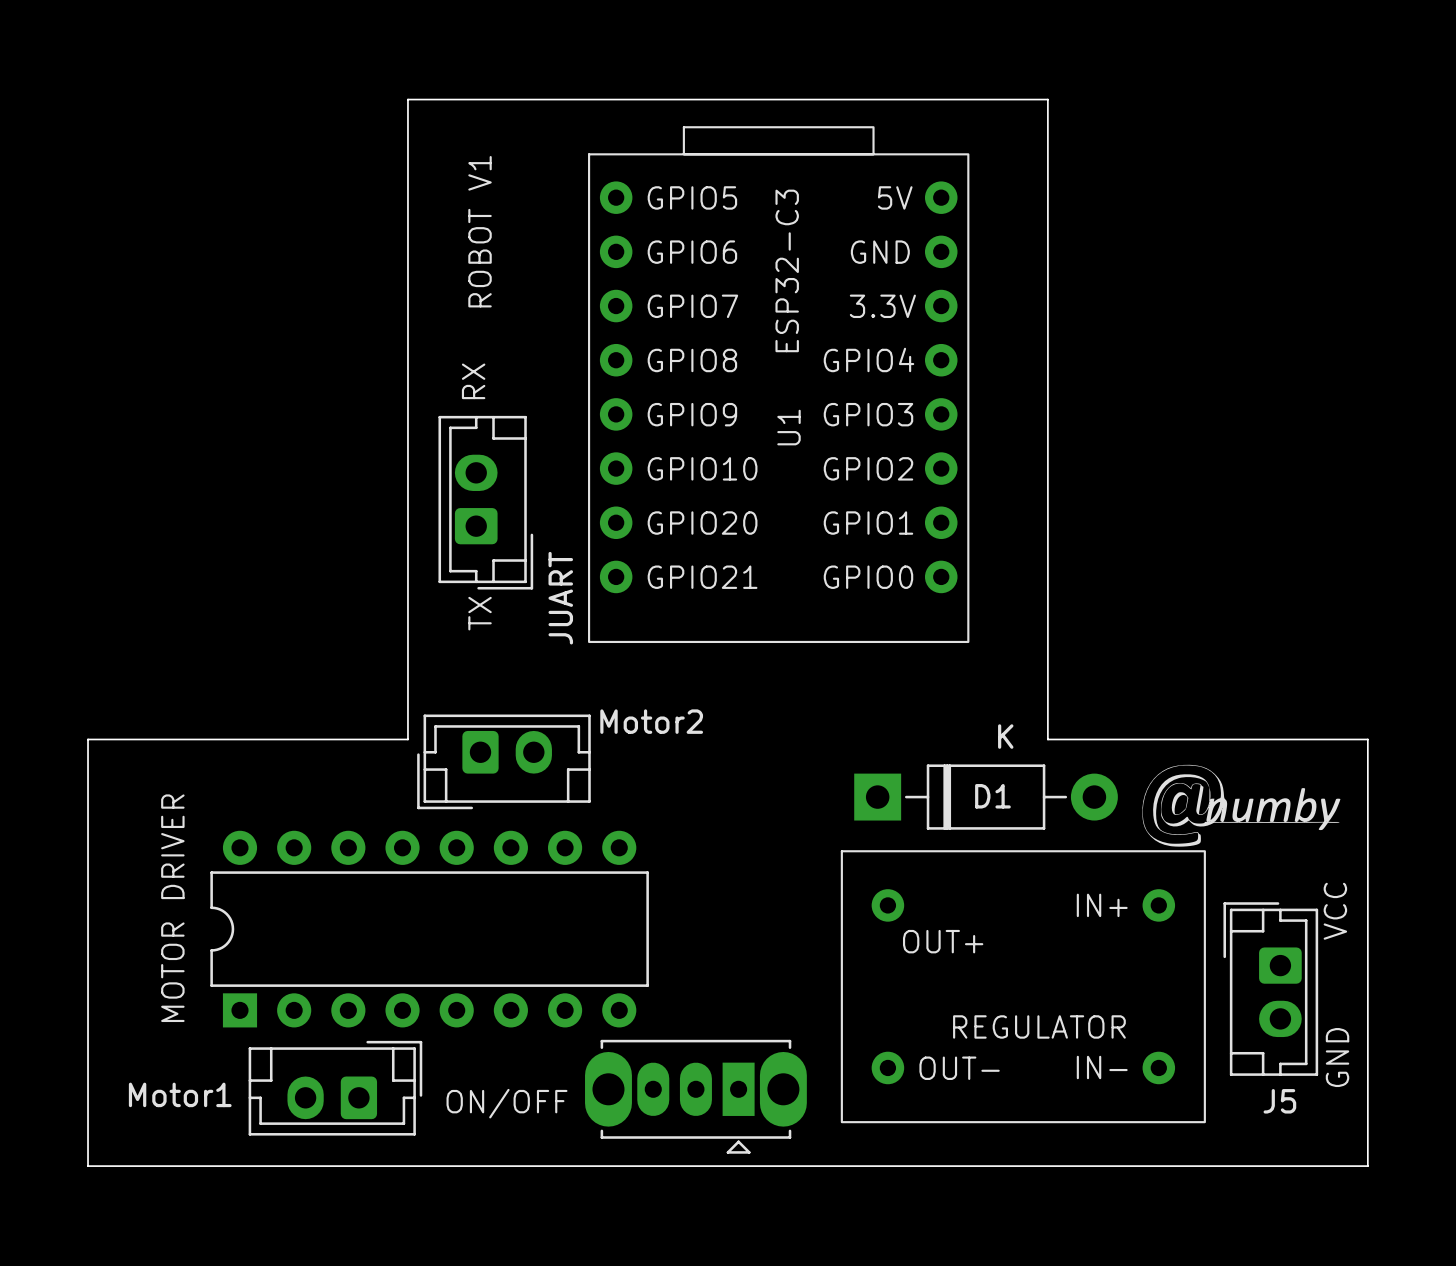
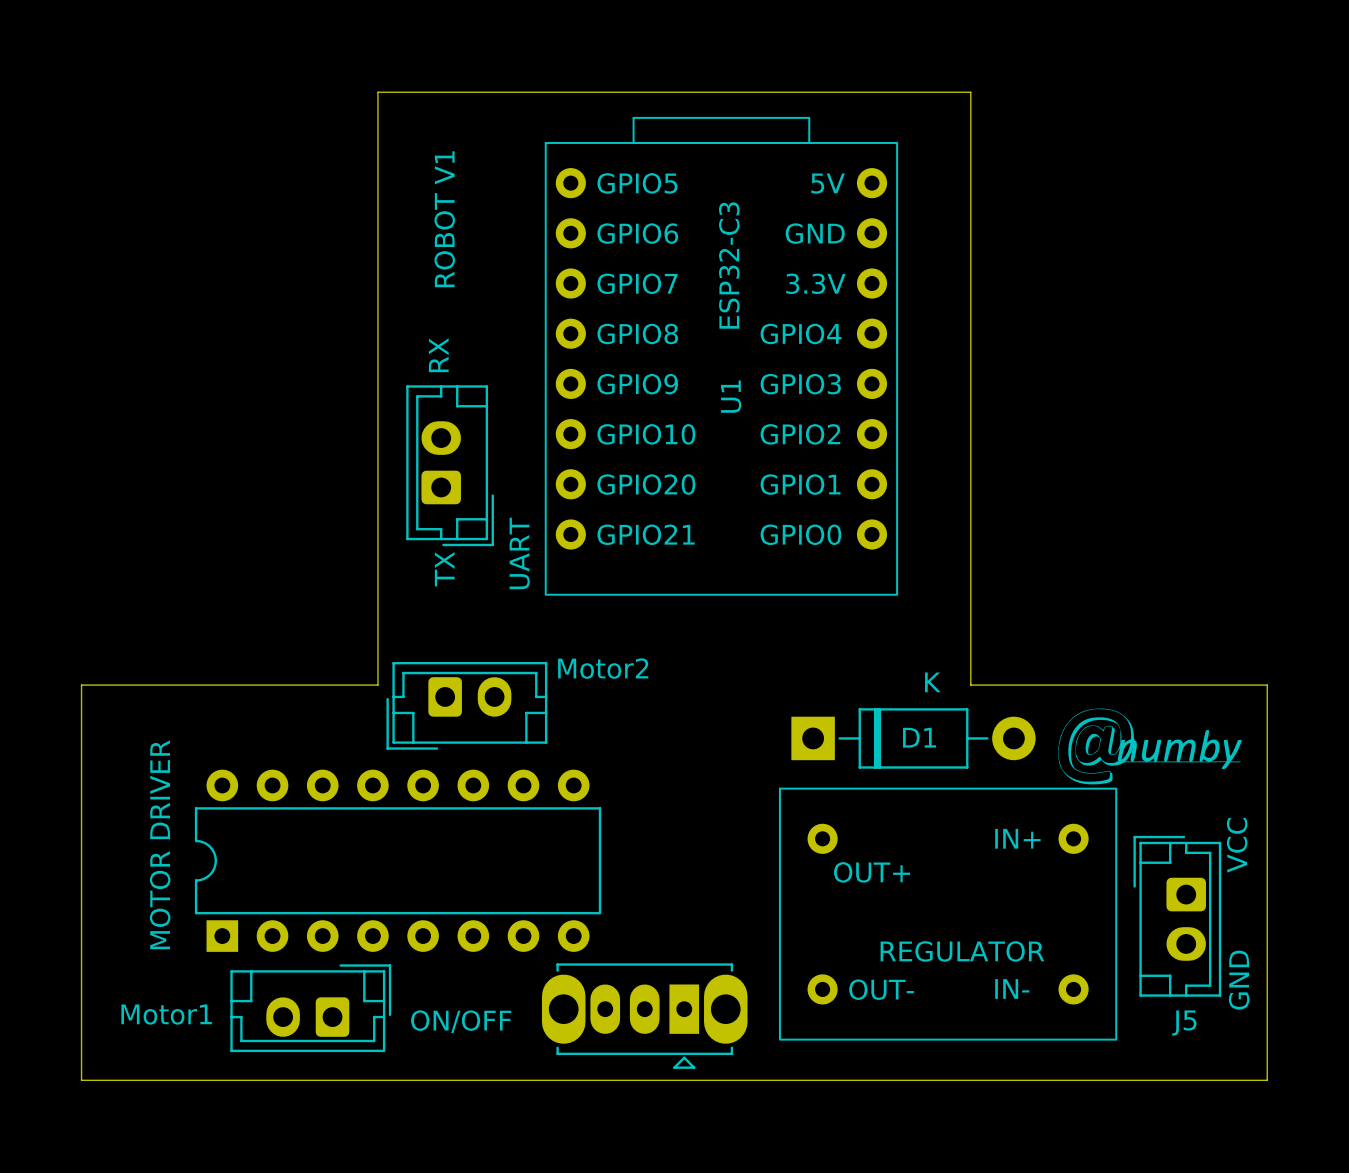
JUART name: JUART (560, 598) -> UART (519, 553)

